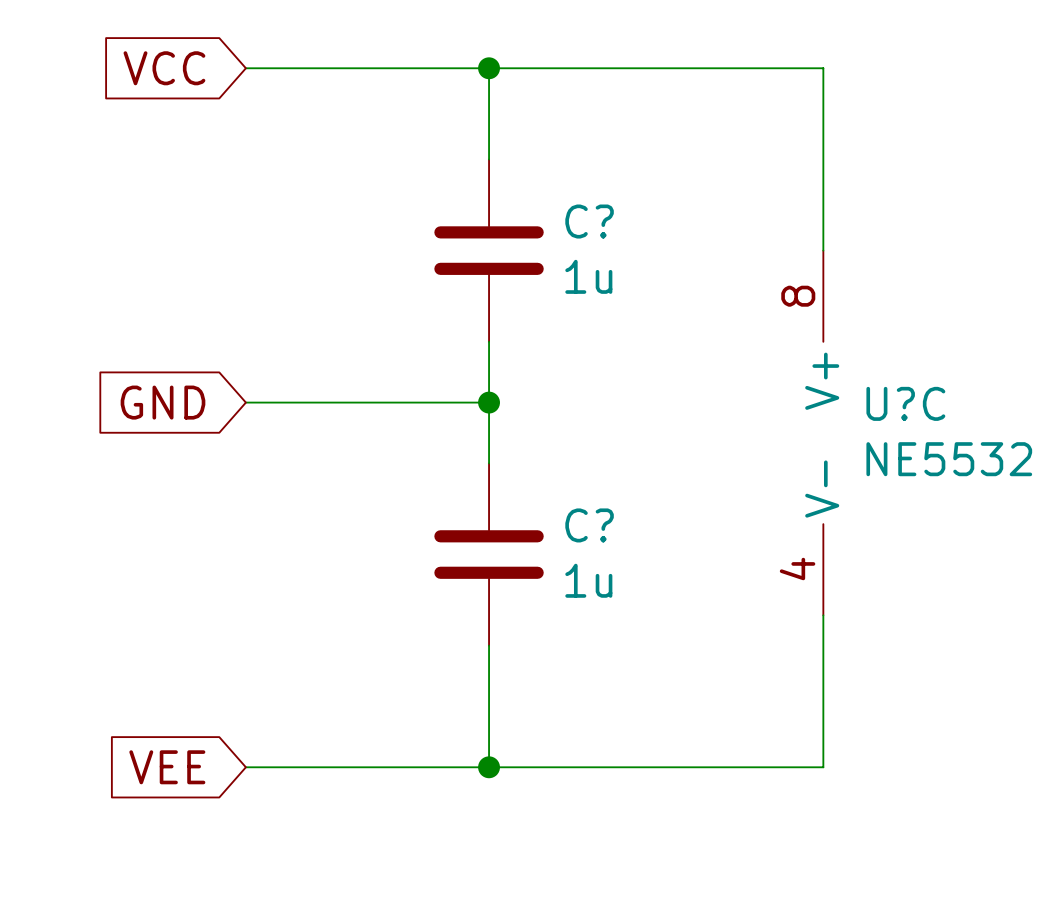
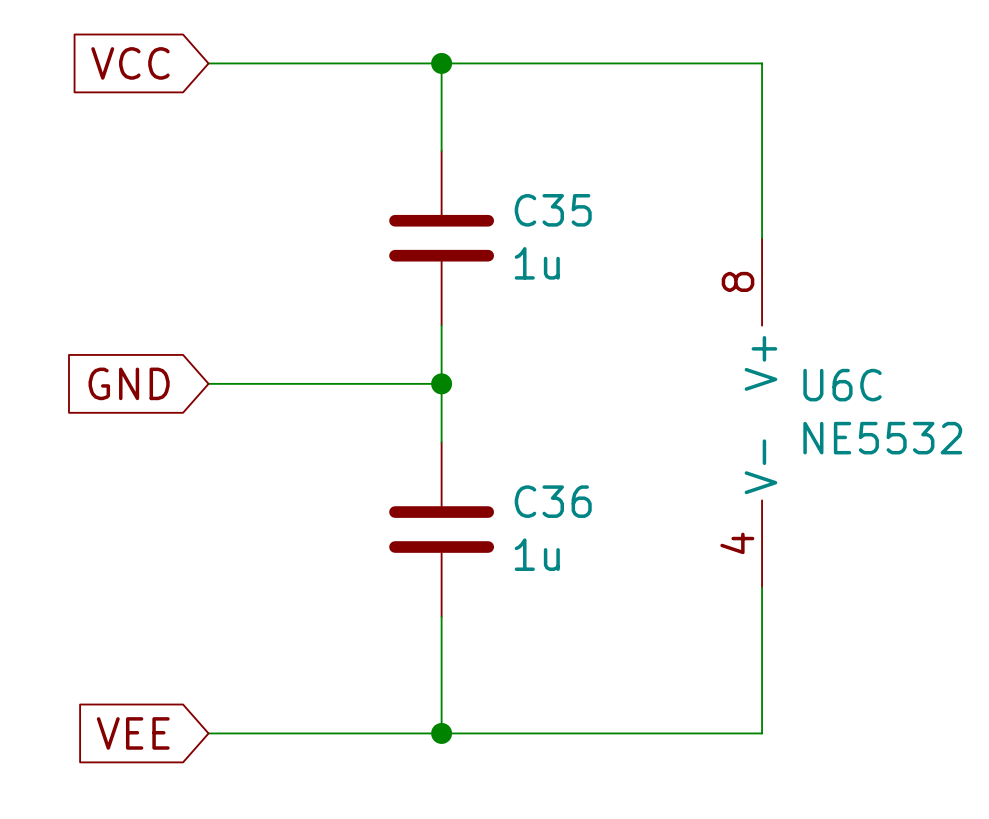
C? name: C? (589, 221) -> C35 (553, 210)
U?C name: U?C (905, 403) -> U6C (842, 385)
C? name: C? (589, 525) -> C36 (553, 501)

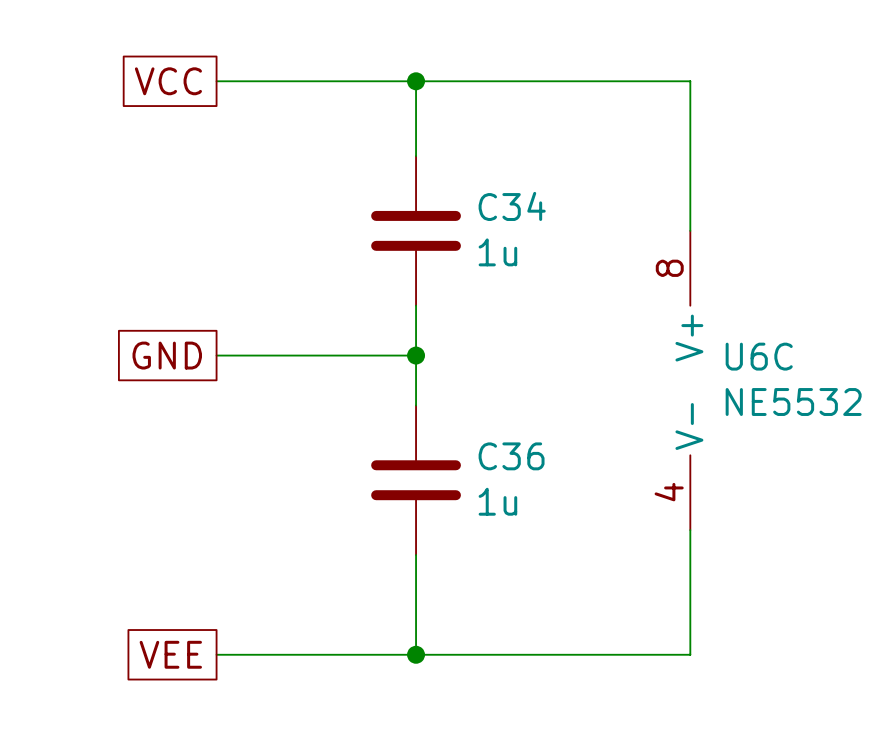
global label shape: input (130, 63) -> passive (168, 81)
C35 name: C35 (553, 210) -> C34 (512, 206)
global label shape: input (129, 383) -> passive (167, 355)
global label shape: input (133, 733) -> passive (170, 654)

